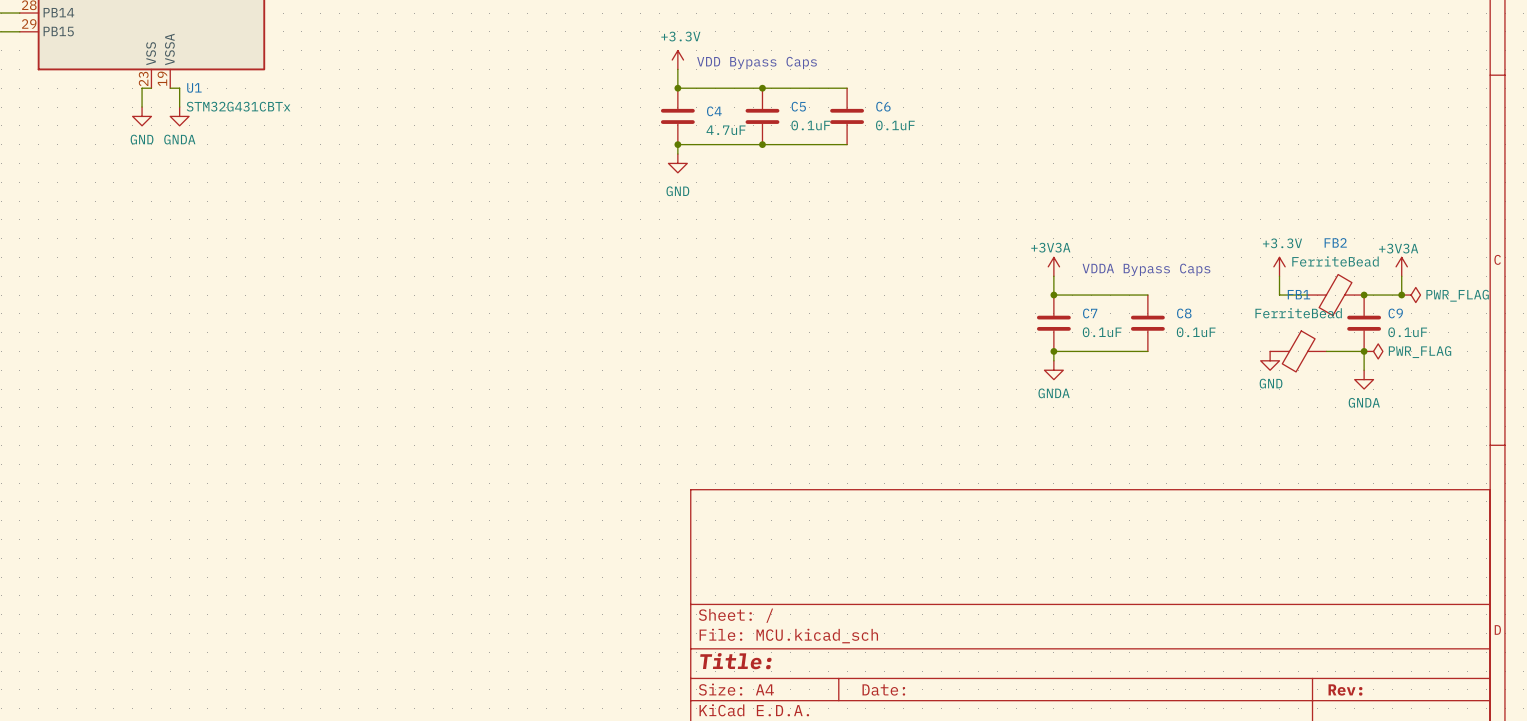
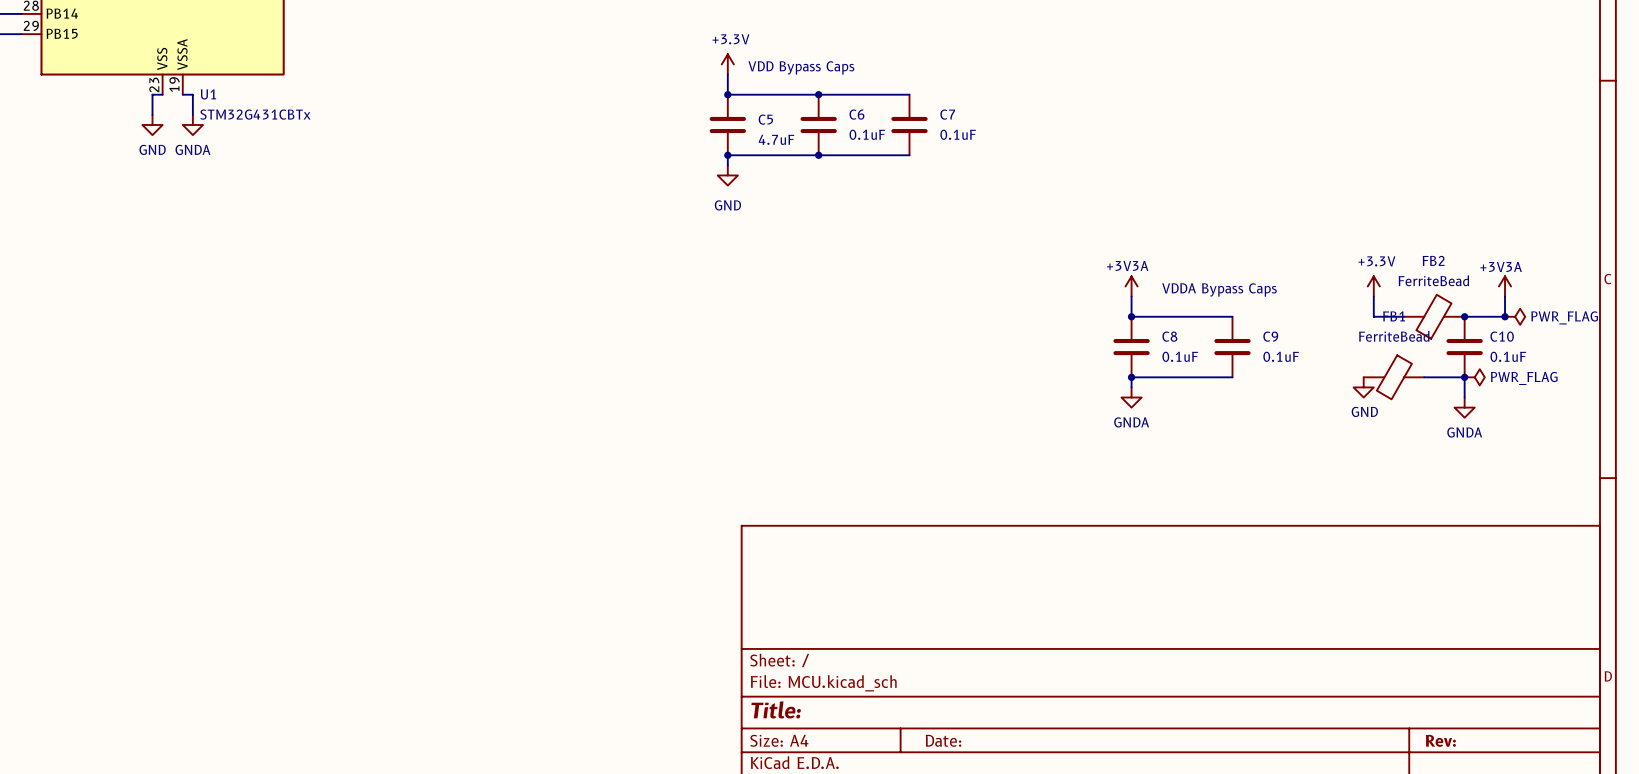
C5 name: C5 (798, 106) -> C6 (856, 114)
C6 name: C6 (883, 106) -> C7 (947, 114)
C4 name: C4 (714, 111) -> C5 (765, 119)
C7 name: C7 (1090, 313) -> C8 (1169, 336)
C8 name: C8 (1184, 313) -> C9 (1270, 336)
C9 name: C9 (1395, 313) -> C10 (1502, 336)

